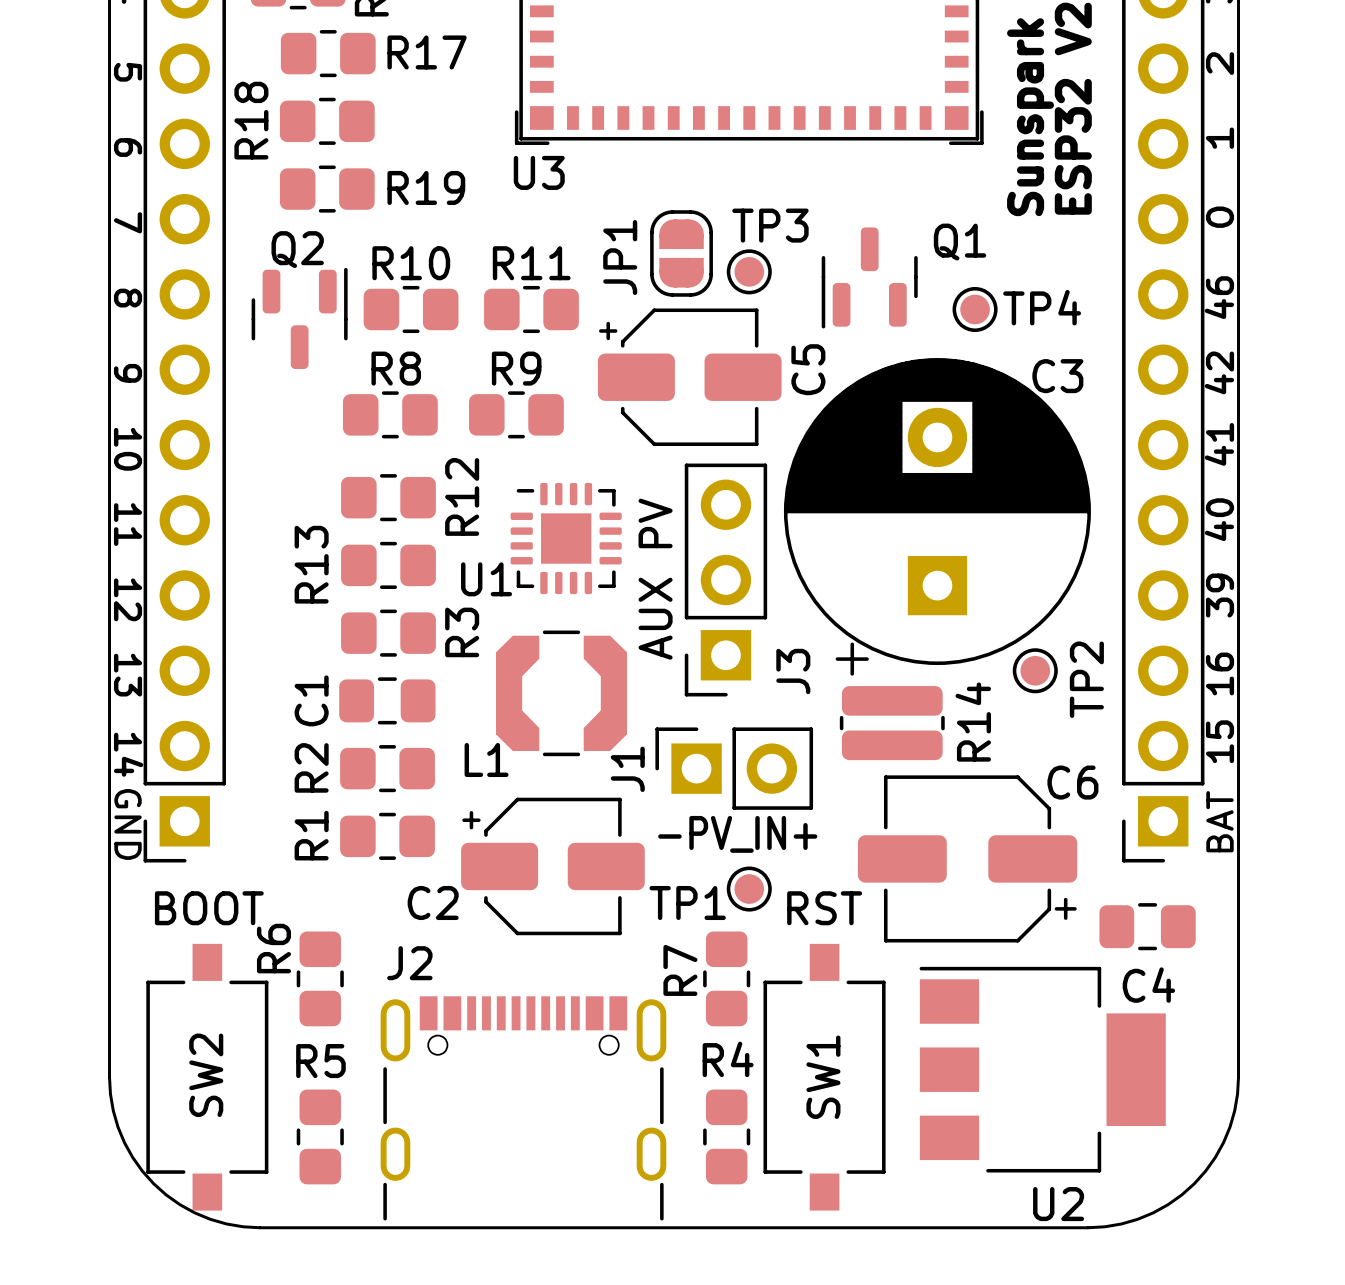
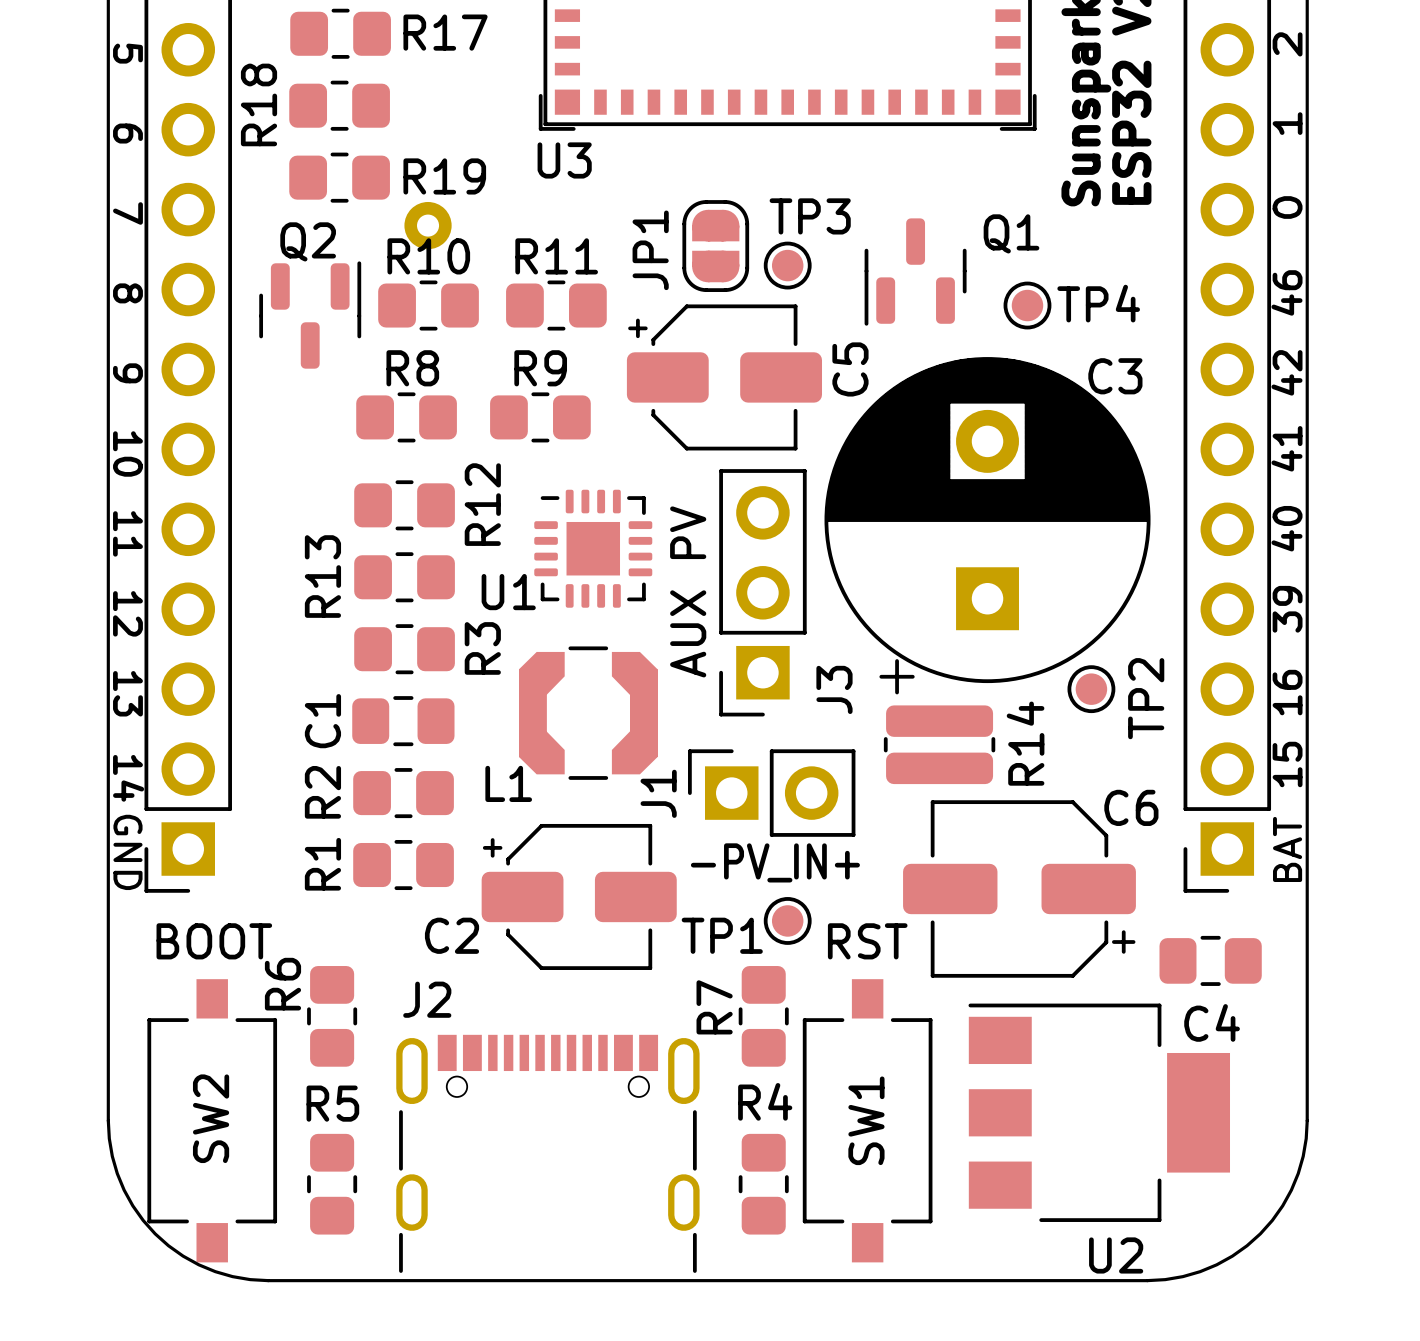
part: none -> (428, 225)

